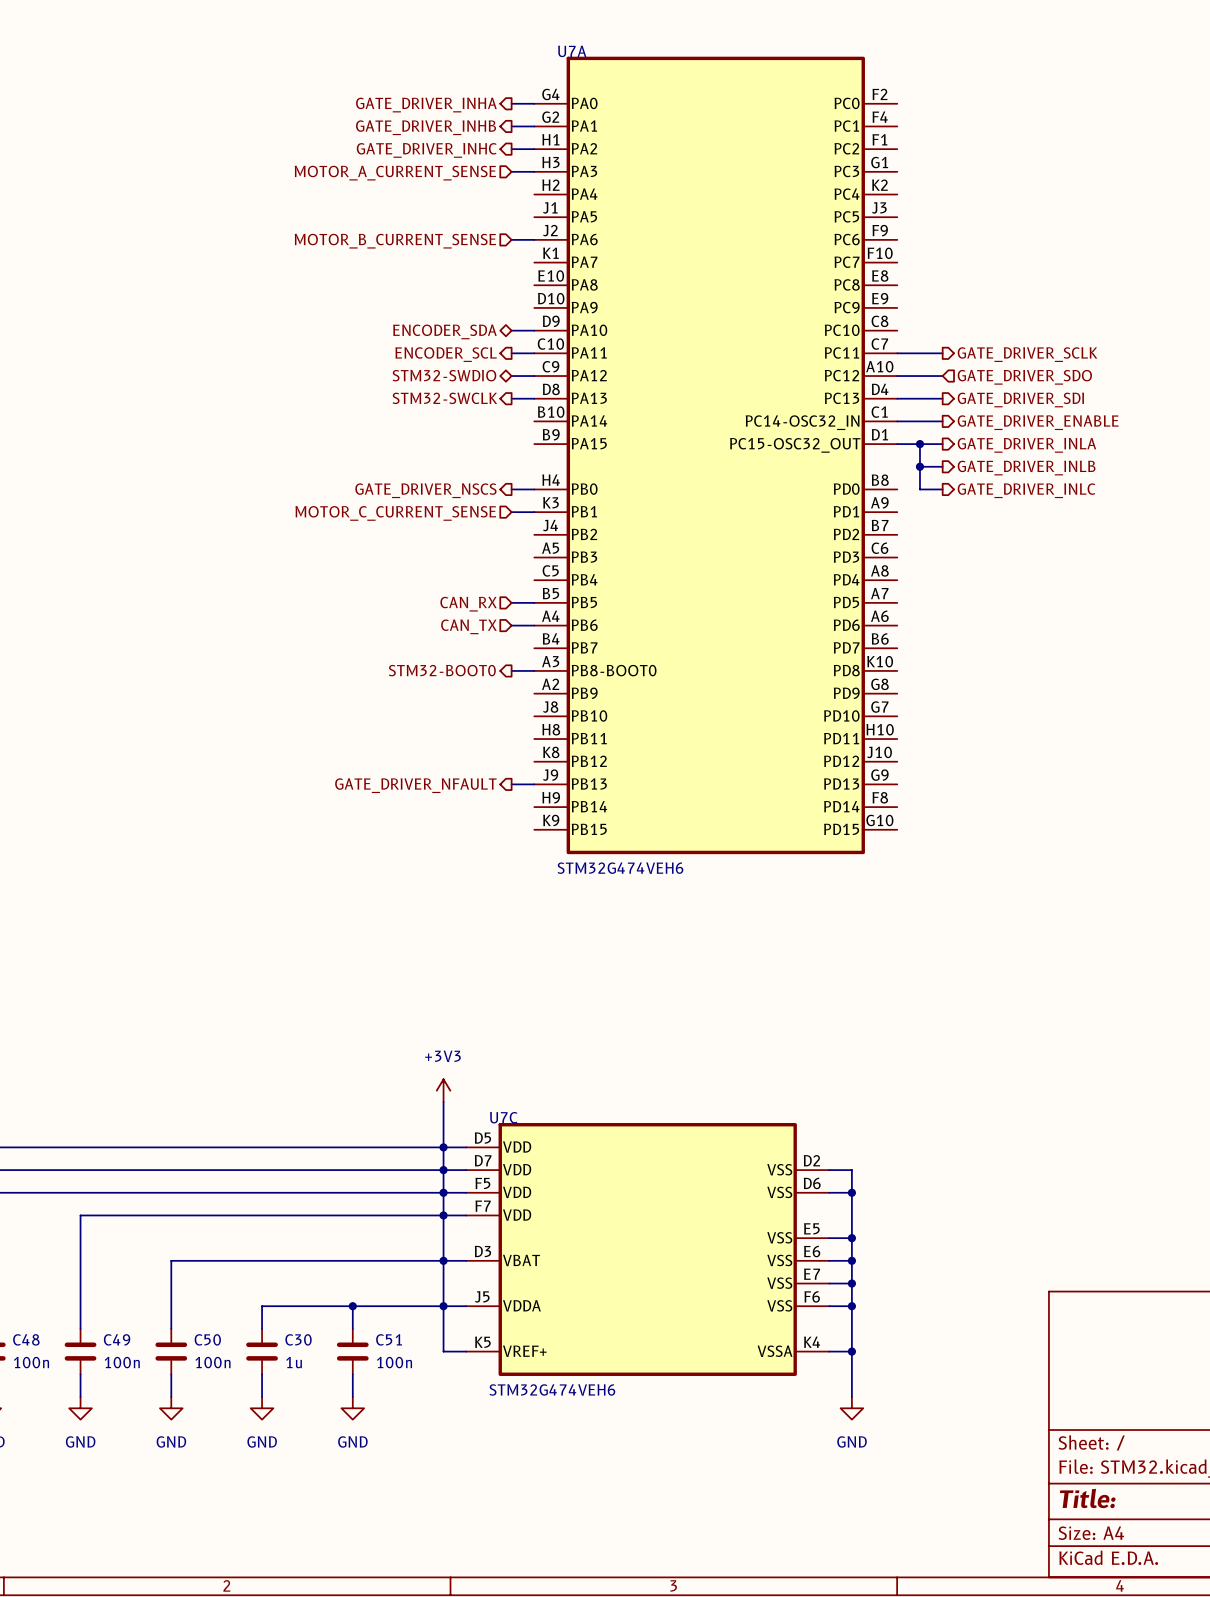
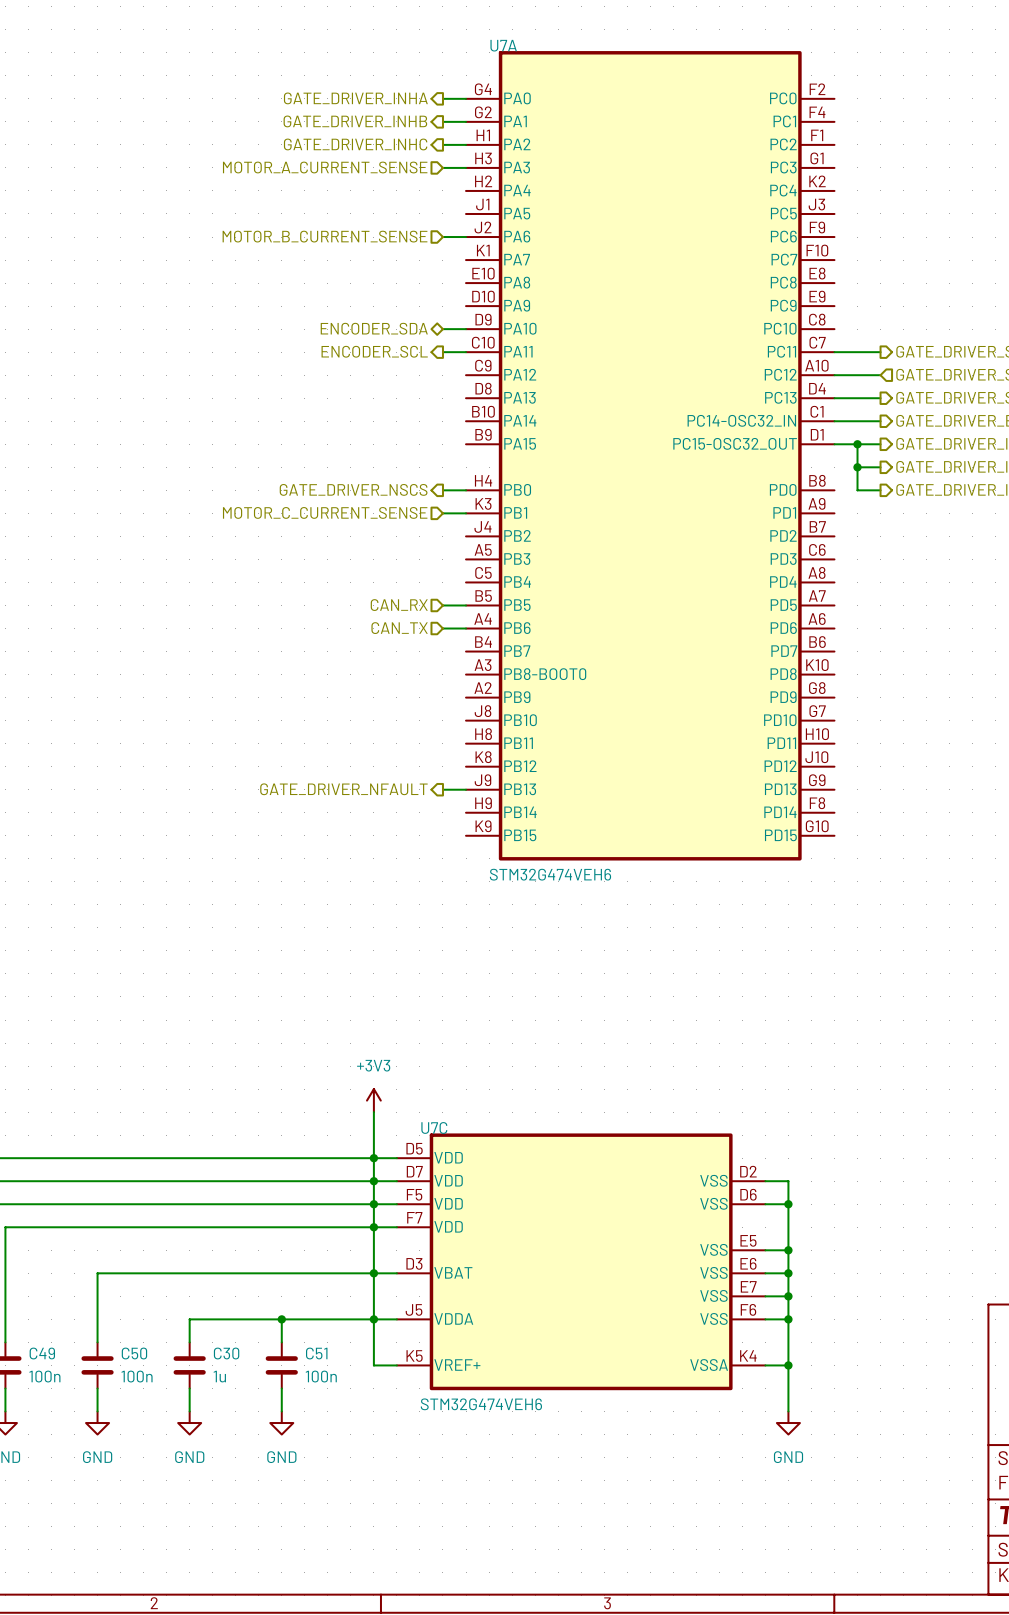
hierarchical label: STM32-SWDIO (444, 375) -> none
wire: (511, 376) (534, 376) -> none
hierarchical label: STM32-SWCLK (444, 398) -> none
wire: (511, 398) (534, 398) -> none
hierarchical label: STM32-BOOT0 (442, 670) -> none
wire: (511, 670) (534, 670) -> none

